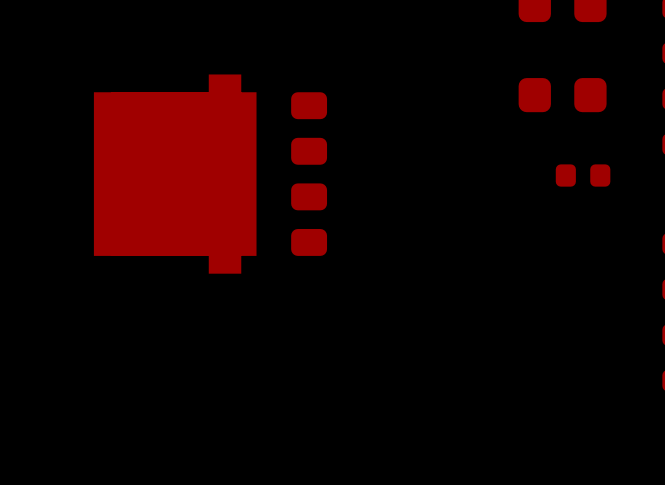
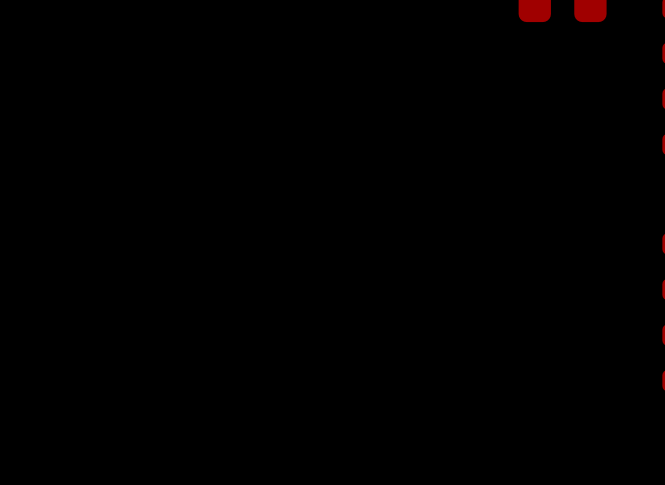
part: (562, 95) -> none
part: (210, 174) -> none
part: (583, 175) -> none

